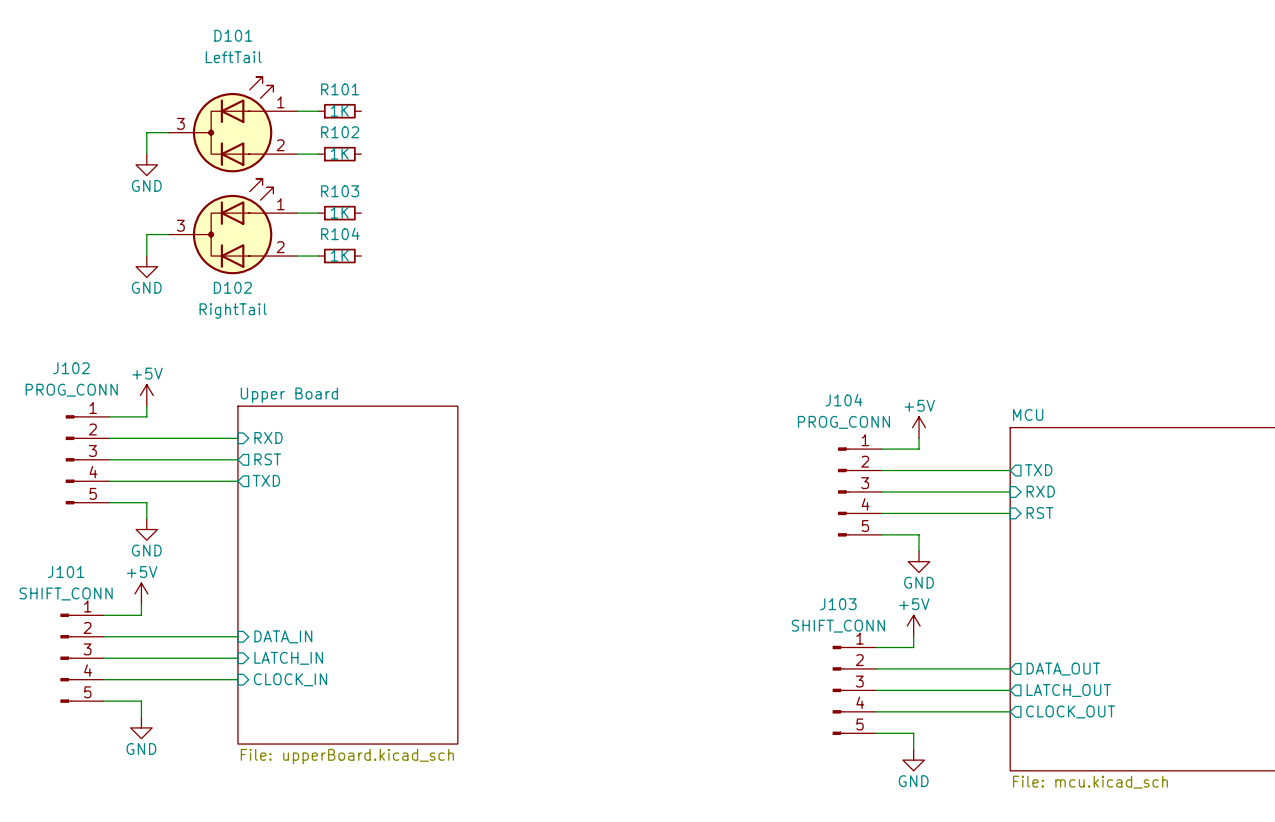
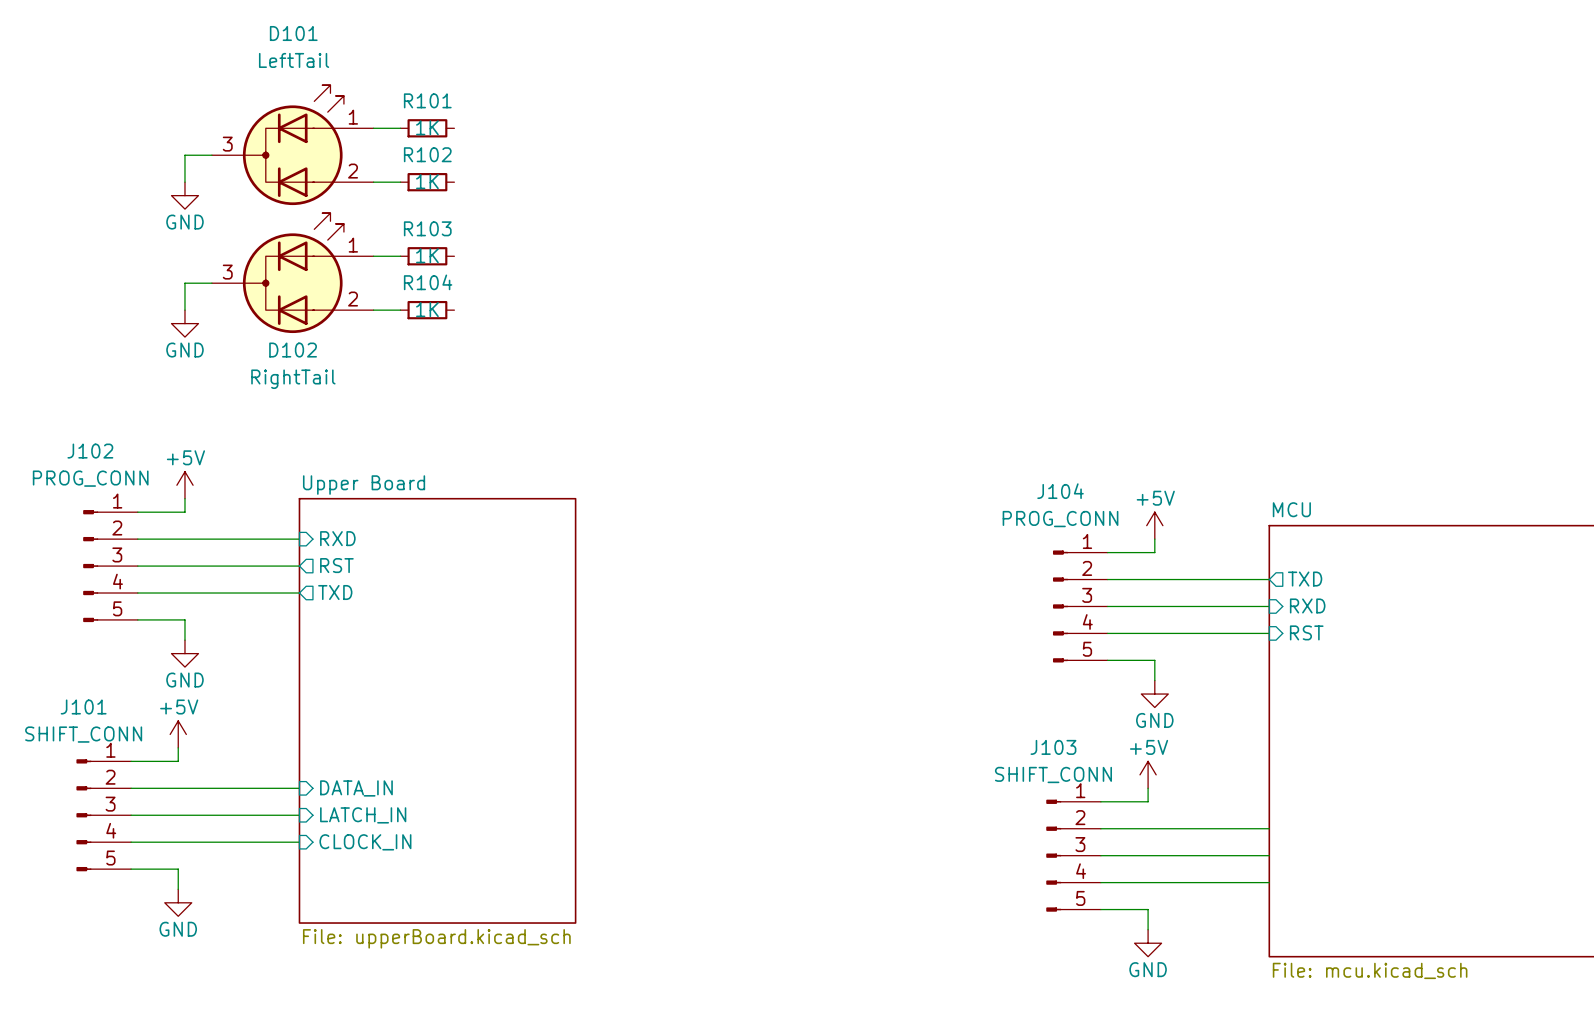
sheet pin: DATA_OUT (1063, 669) -> none
sheet pin: LATCH_OUT (1068, 690) -> none
sheet pin: CLOCK_OUT (1070, 711) -> none

